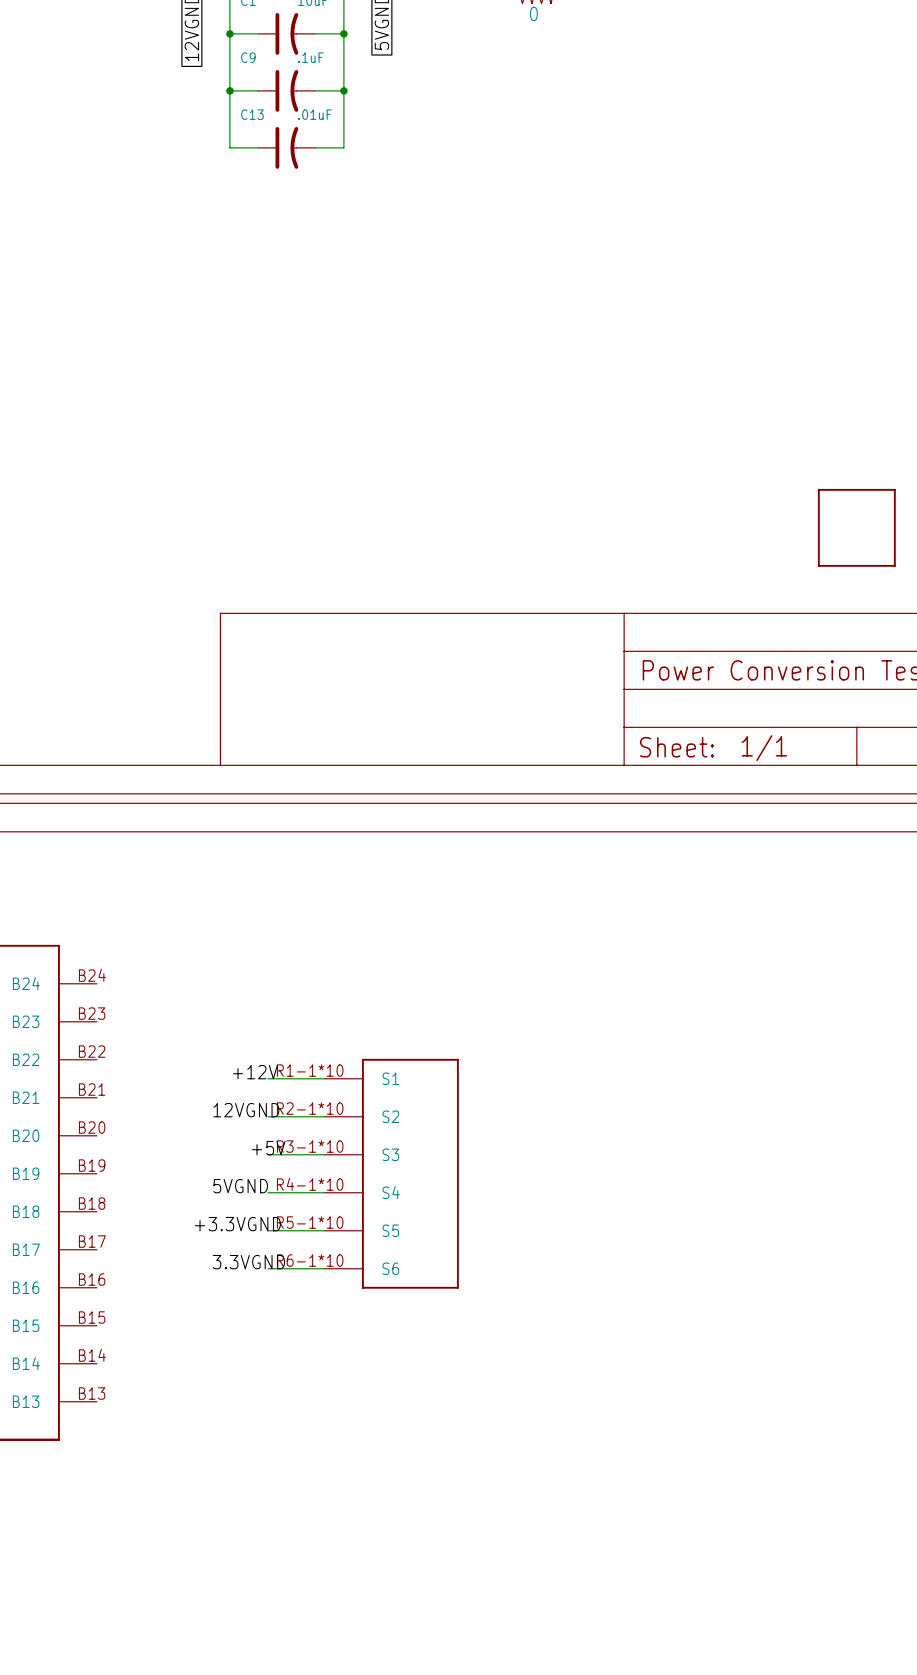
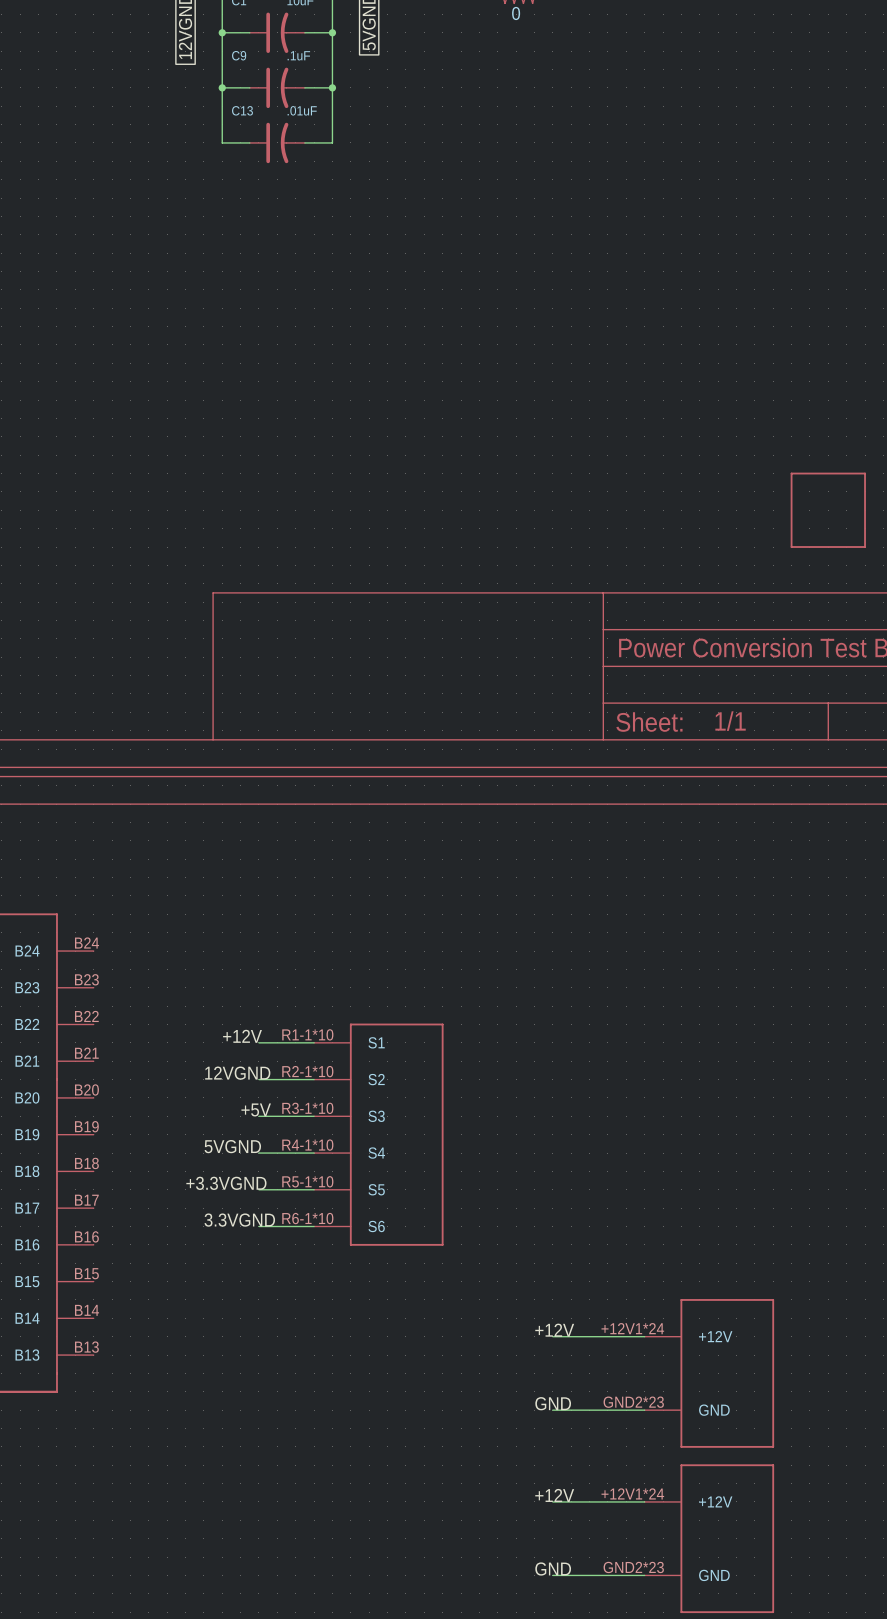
label: none -> +12V (554, 1330)
wire: none -> (552, 1336) (644, 1336)
part: none -> (709, 1373)
label: none -> GND (553, 1403)
wire: none -> (552, 1410) (644, 1410)
label: none -> +12V (554, 1495)
wire: none -> (552, 1501) (644, 1501)
part: none -> (709, 1538)
label: none -> GND (553, 1569)
wire: none -> (552, 1575) (644, 1575)

